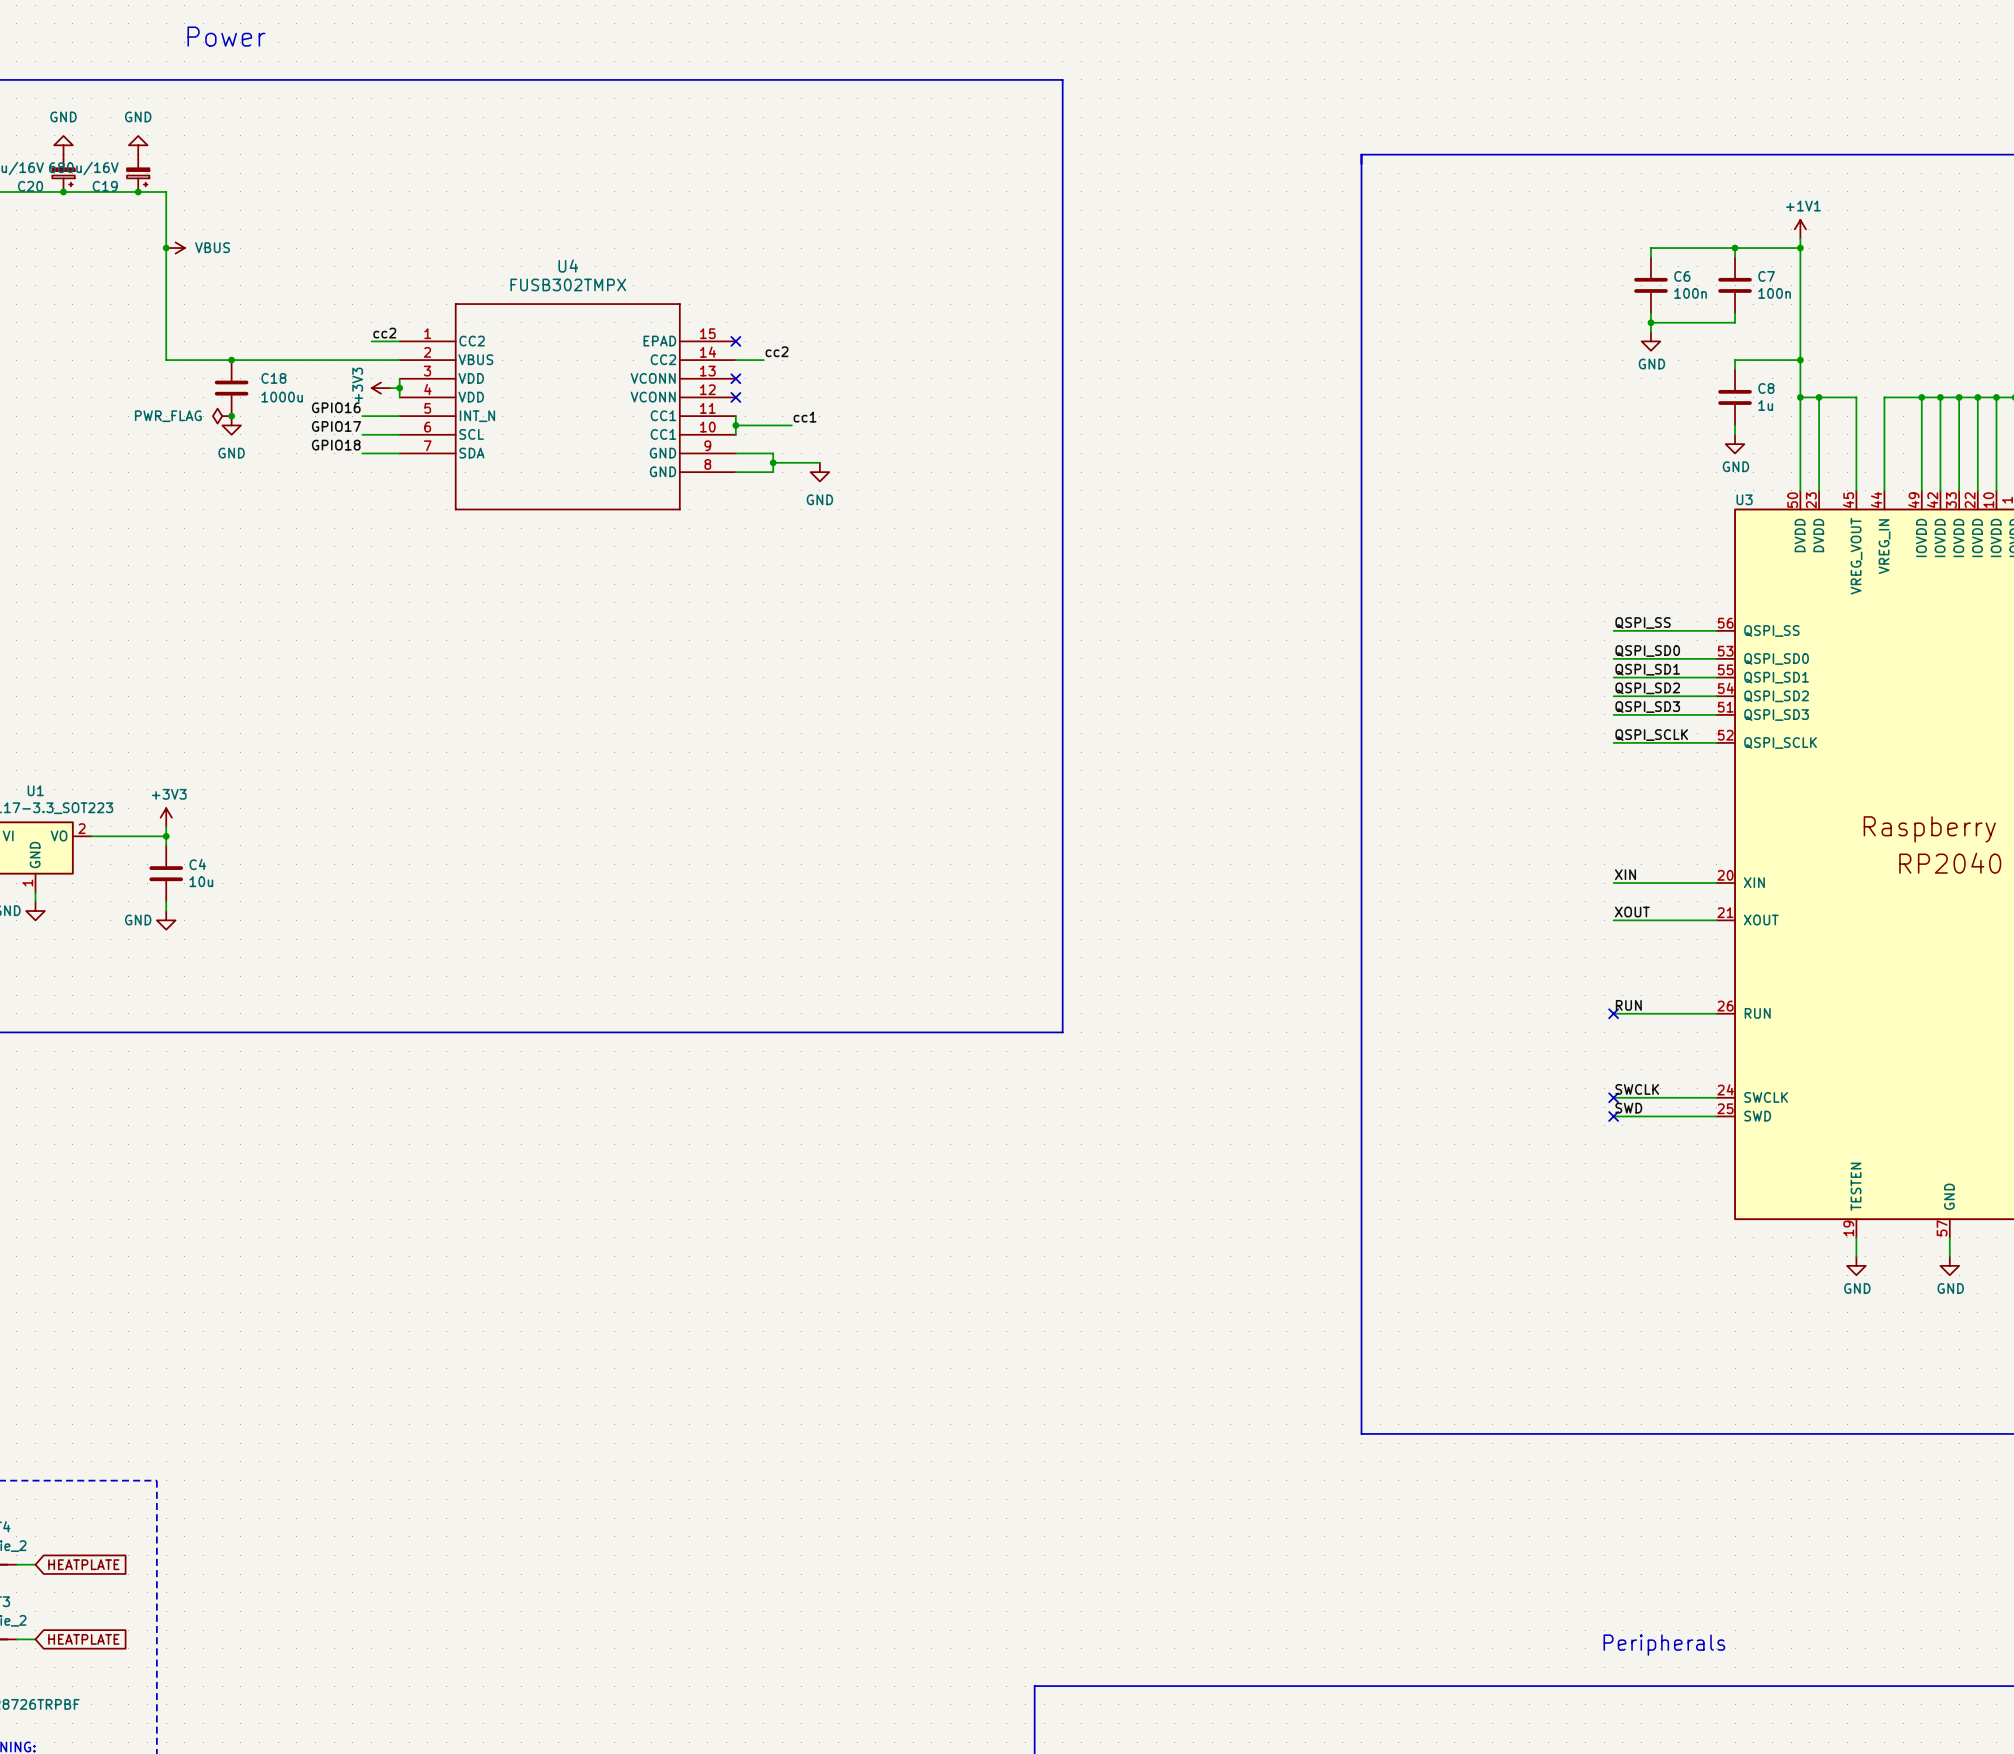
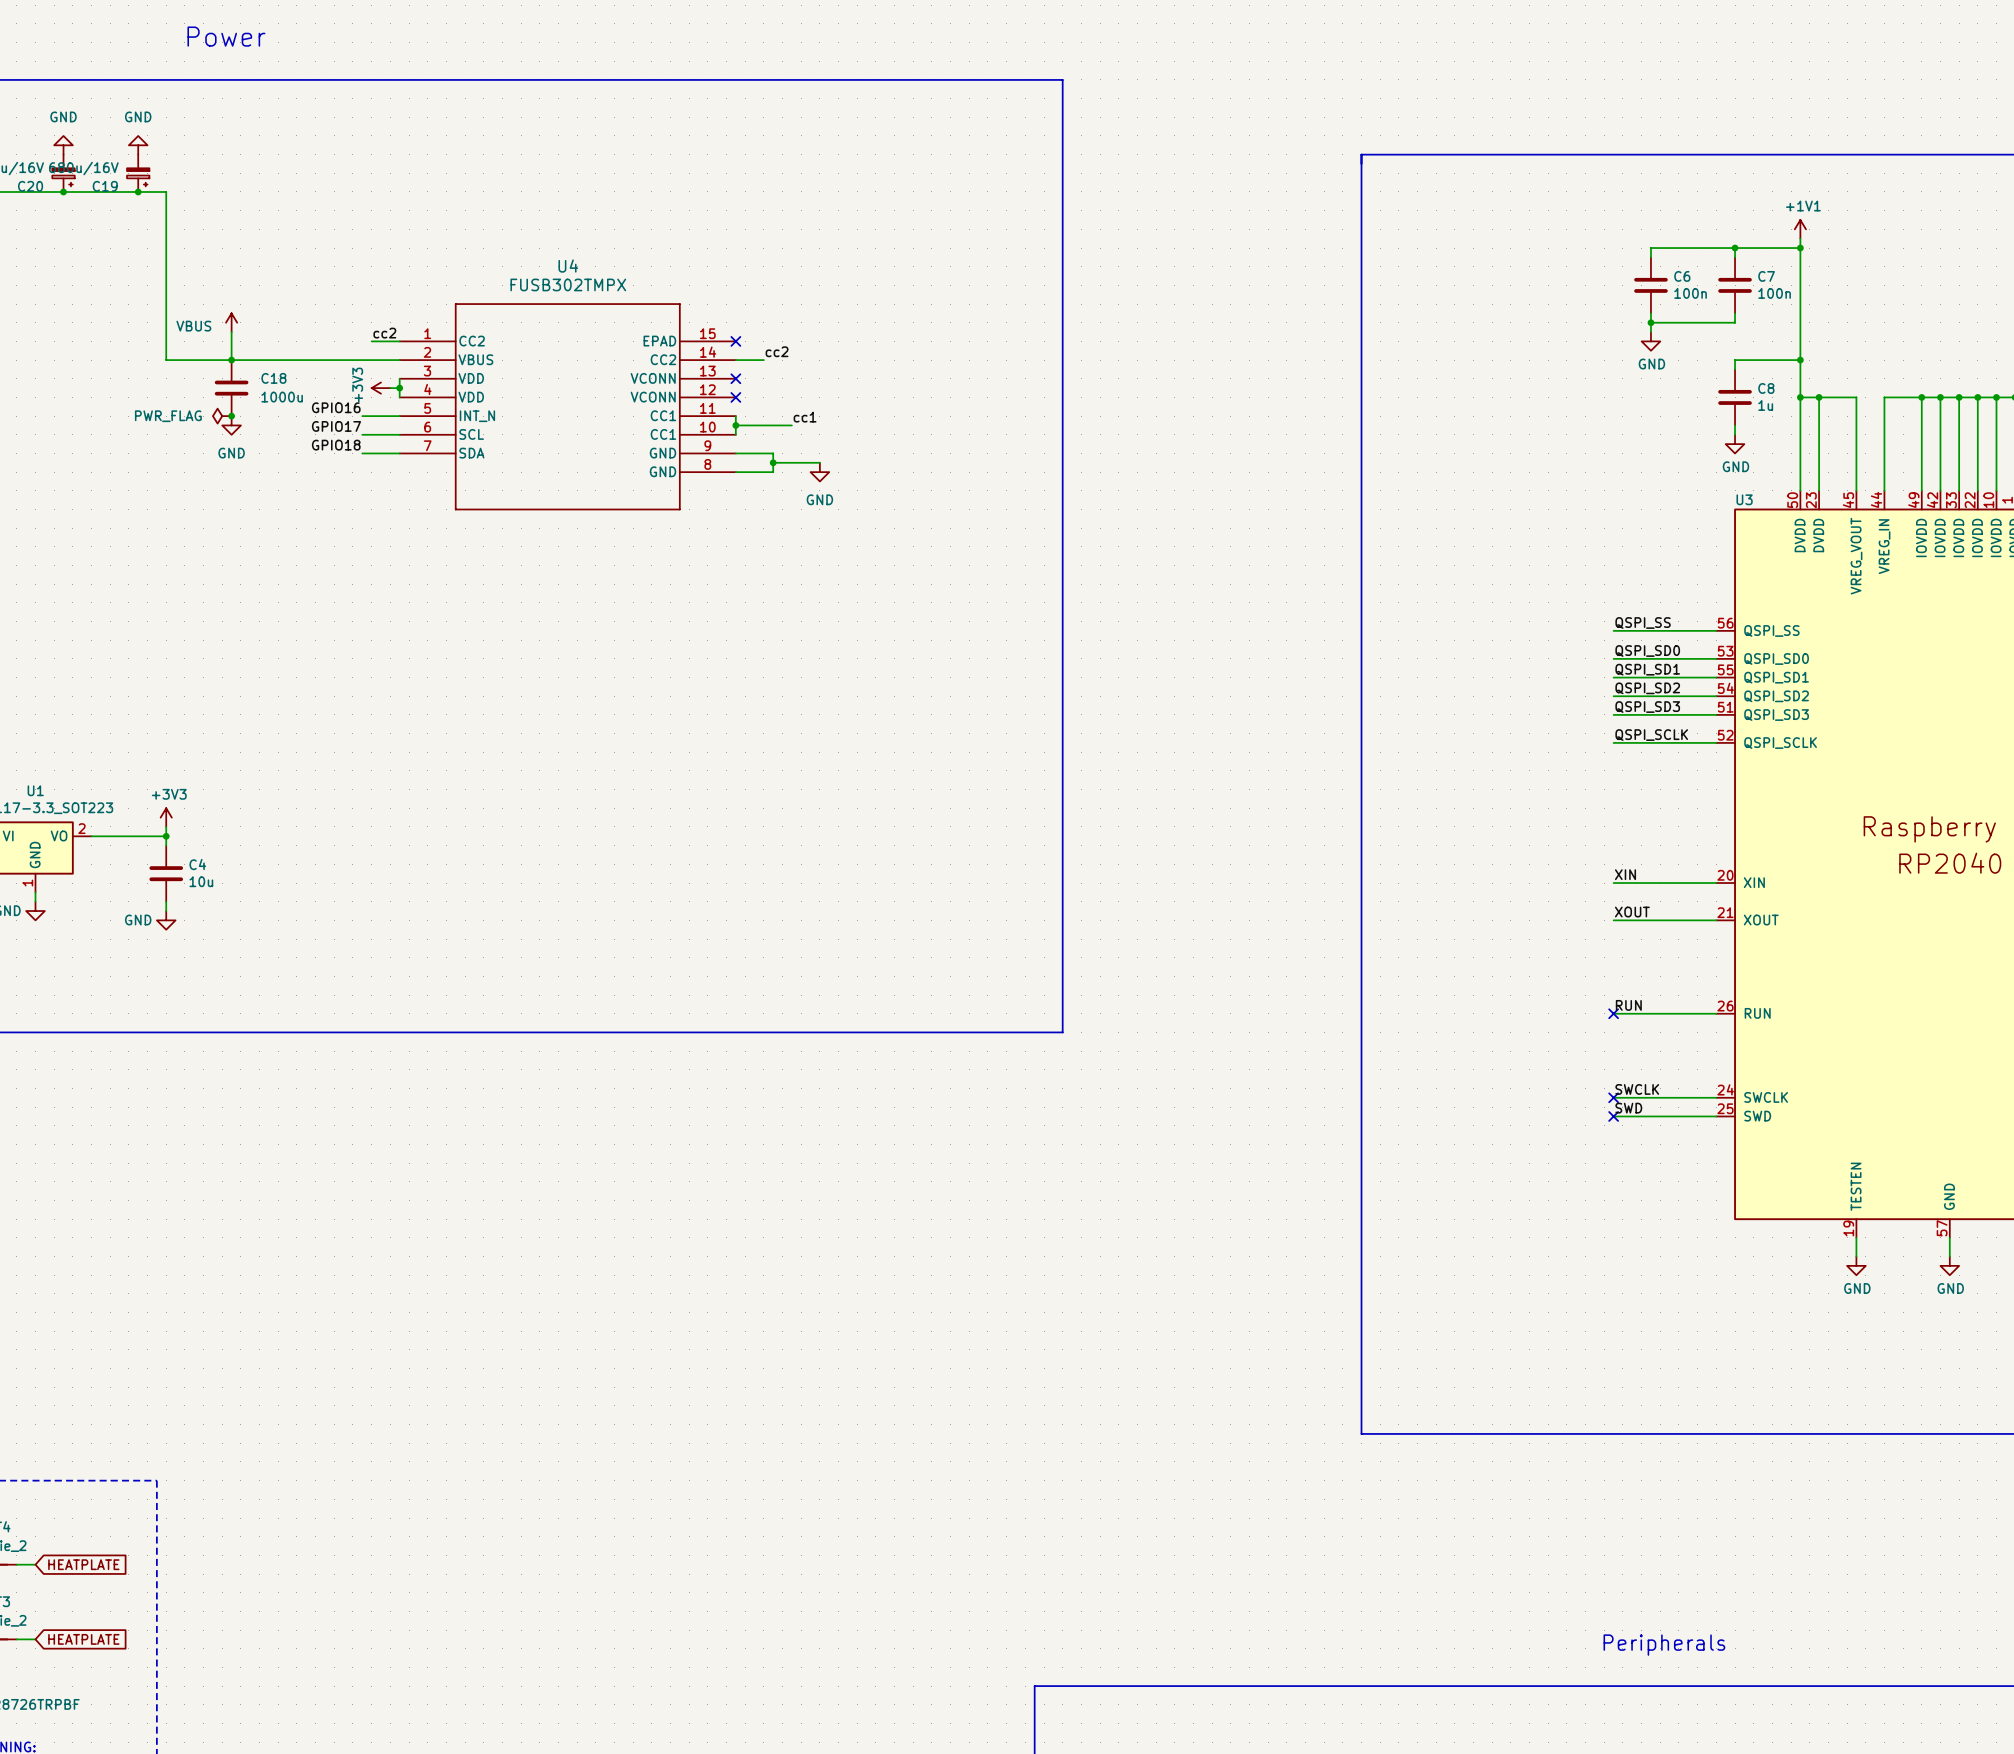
power symbol text position: VBUS (212, 247) -> VBUS (193, 326)
junction: (166, 248) -> none
power symbol rotation: 0° (175, 248) -> 90° counterclockwise (231, 322)
power symbol position: VBUS (175, 248) -> VBUS (231, 322)
wire: none -> (231, 332) (231, 360)

